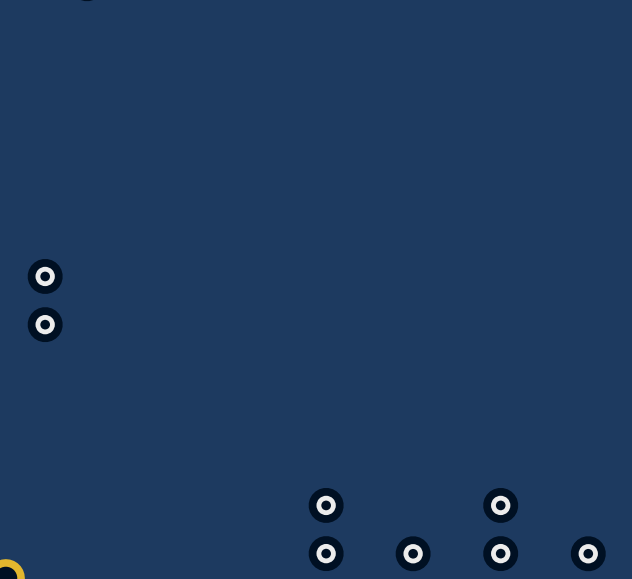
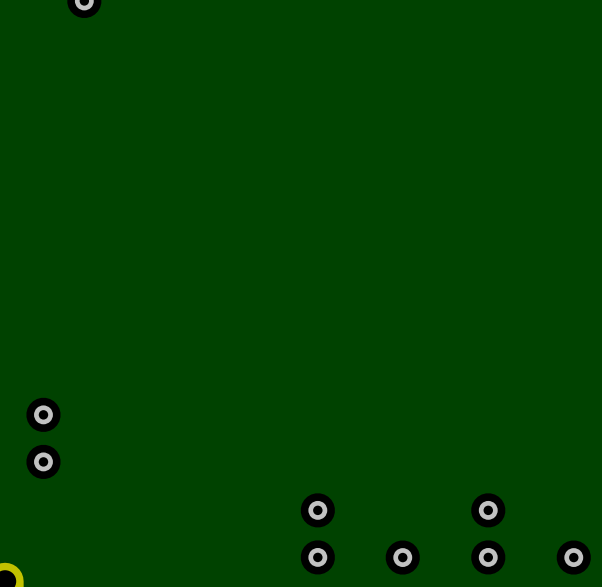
via: (45, 276) -> none
via: (45, 324) -> none
via: none -> (43, 414)
via: none -> (43, 461)

